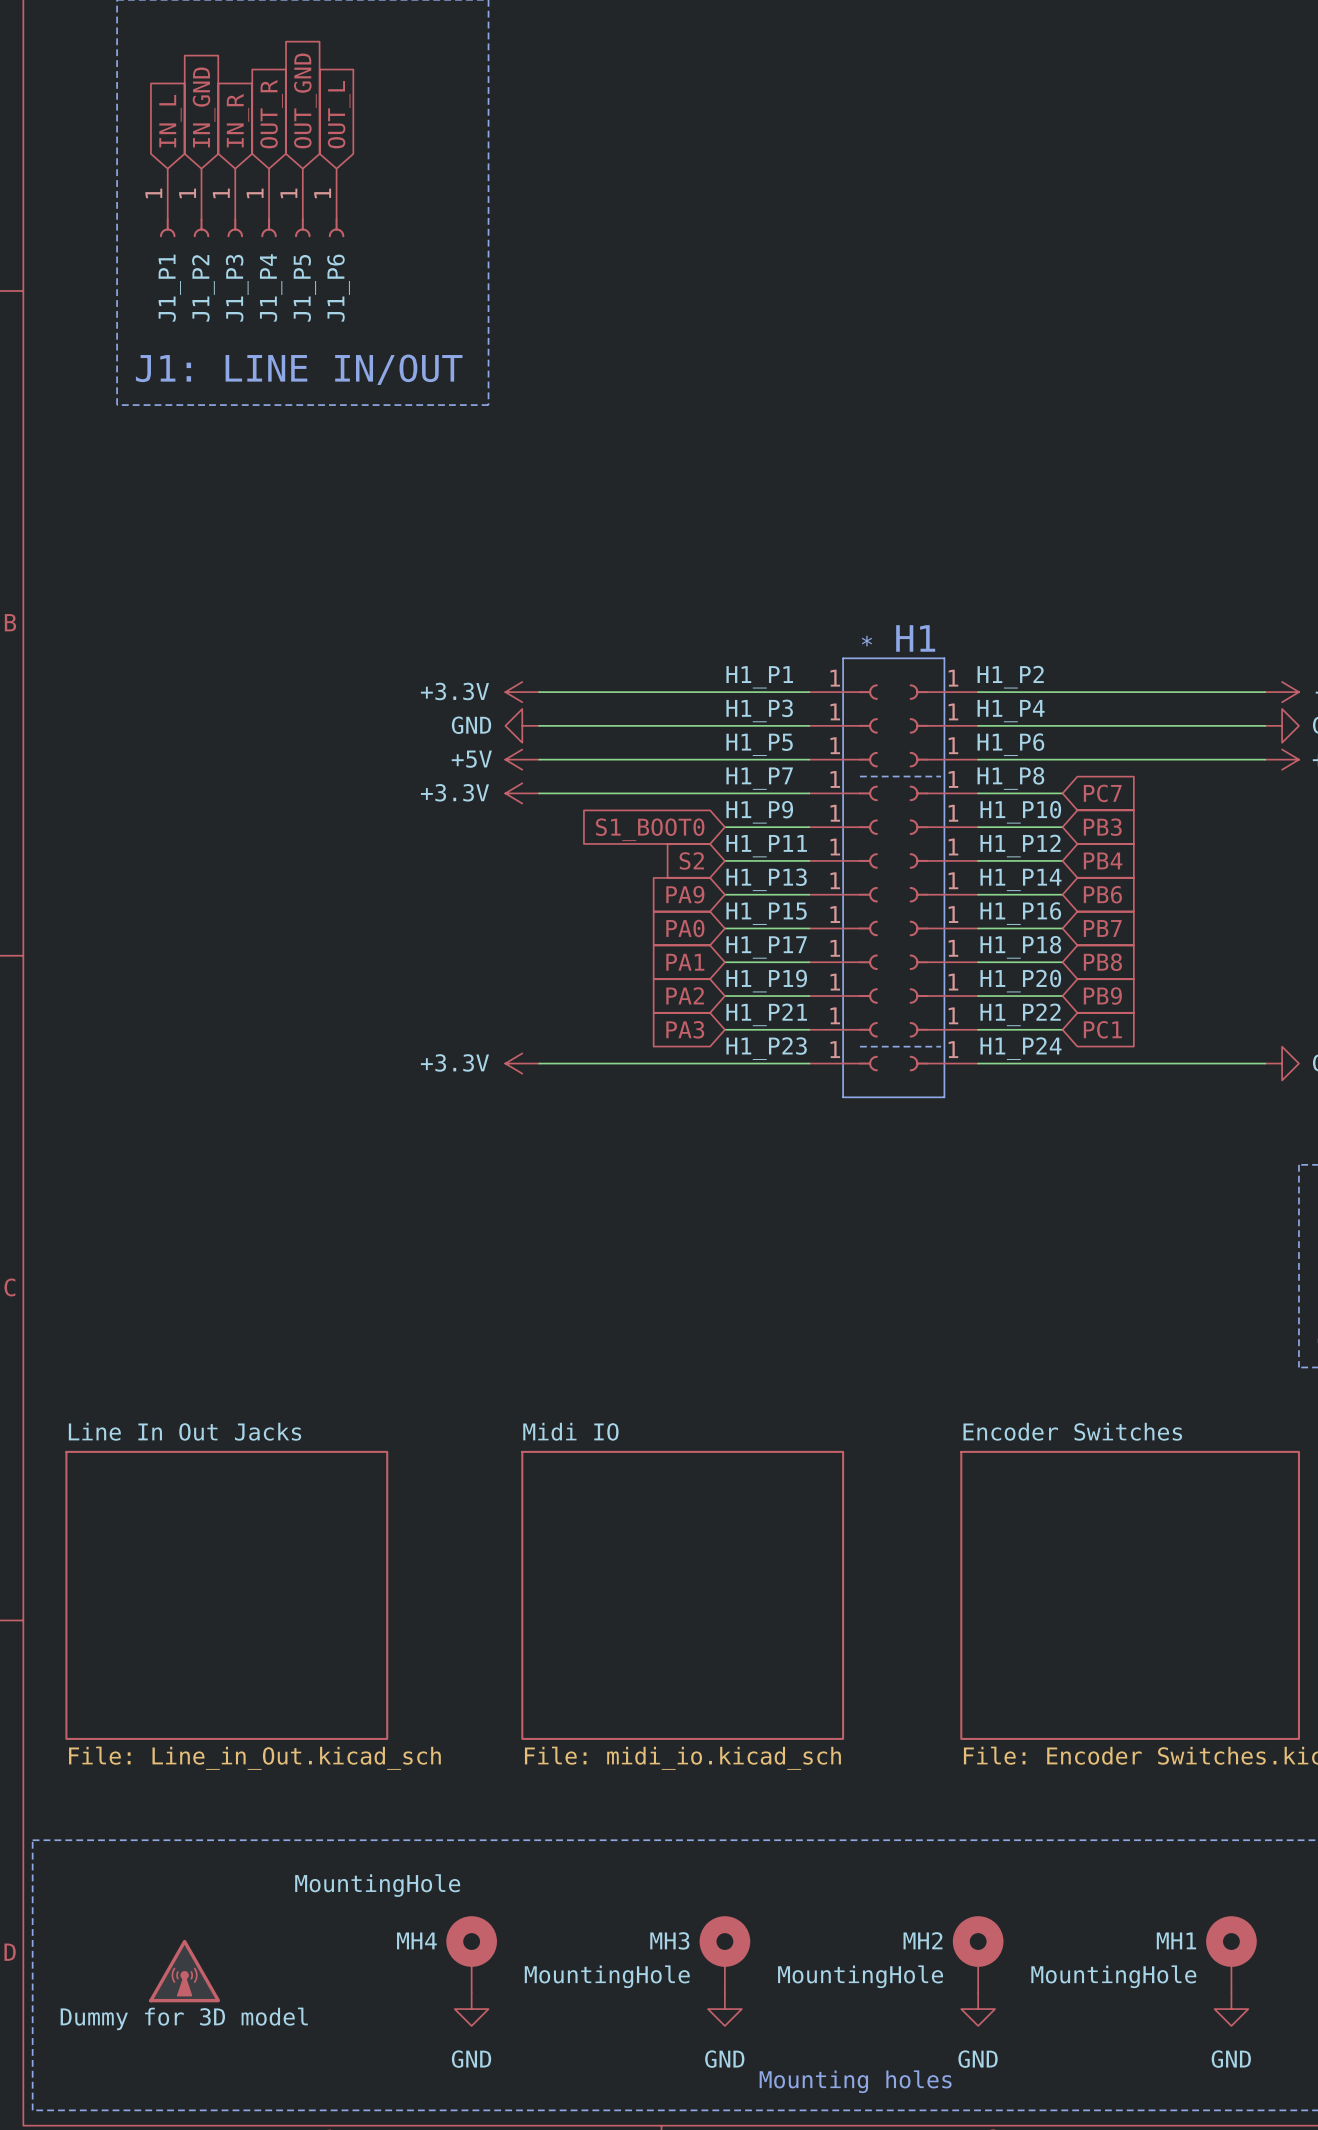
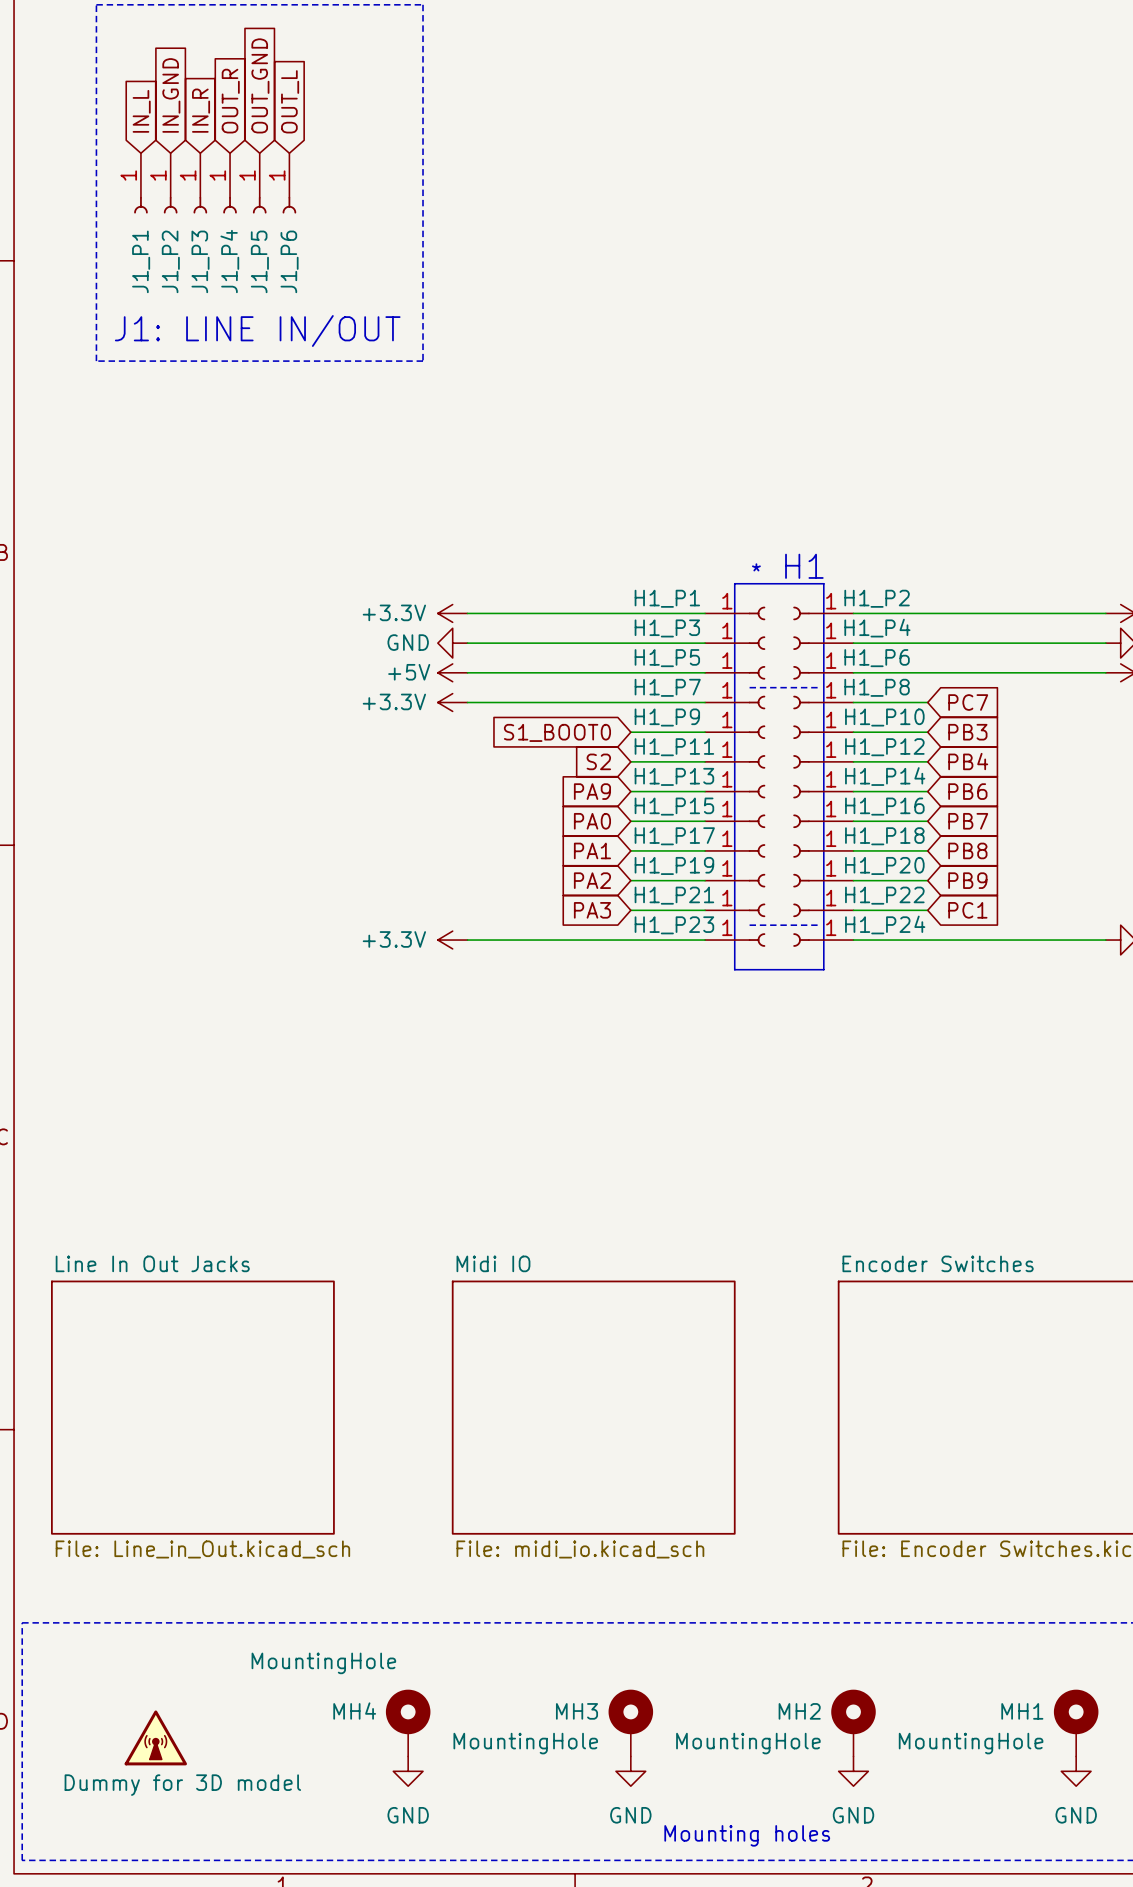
part value position: Dummy for 3D model (184, 2018) -> Dummy for 3D model (182, 1785)

